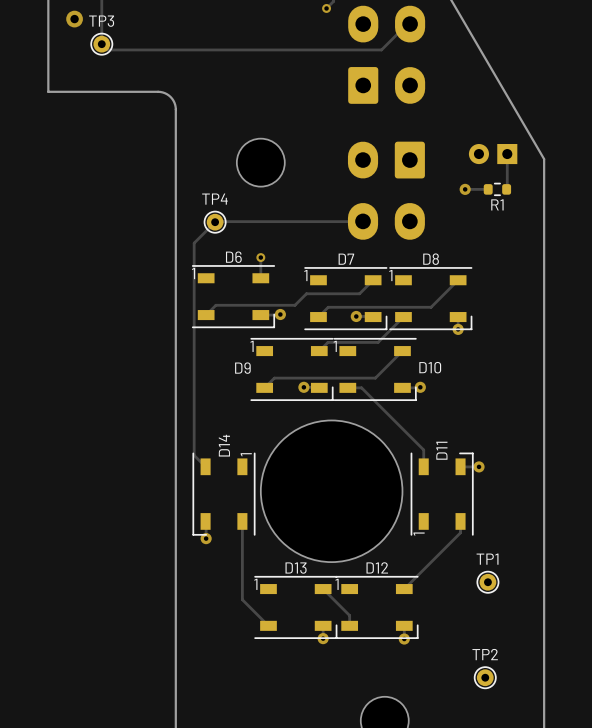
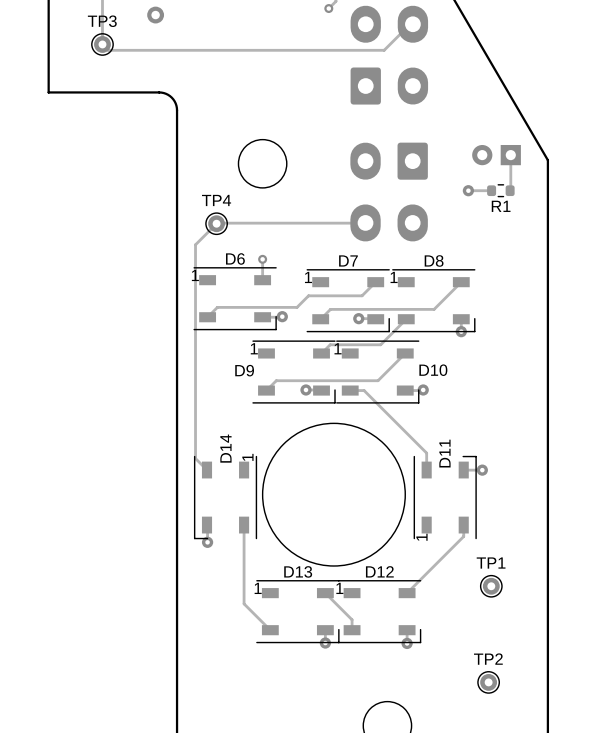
via: none -> (155, 15)
via: (74, 19) -> none

